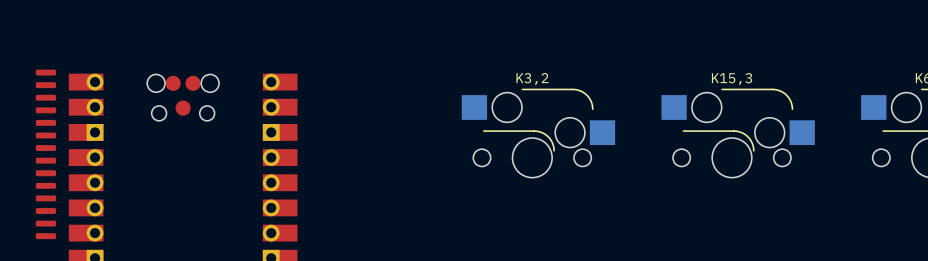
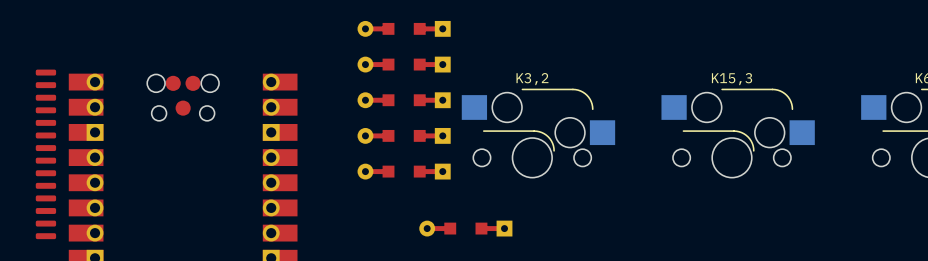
part: none -> (404, 28)
part: none -> (404, 64)
part: none -> (404, 100)
part: none -> (404, 135)
part: none -> (404, 171)
part: none -> (465, 228)

